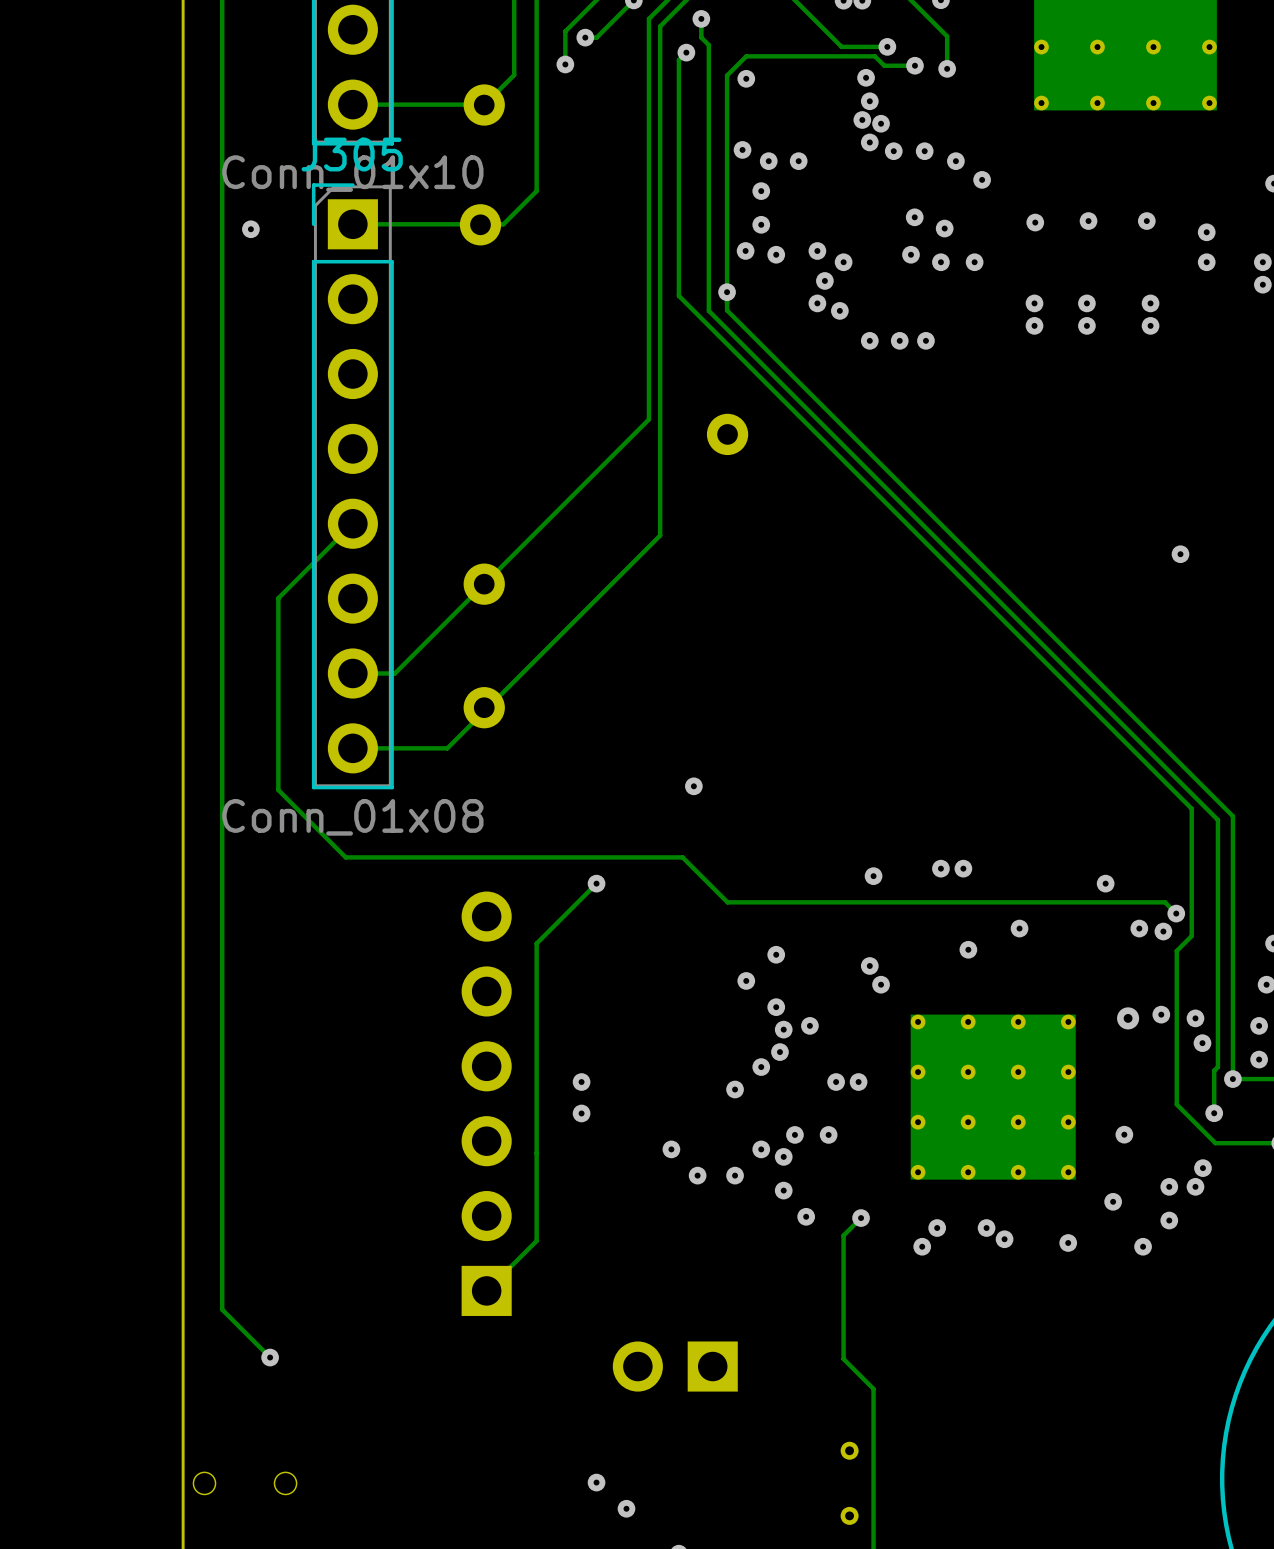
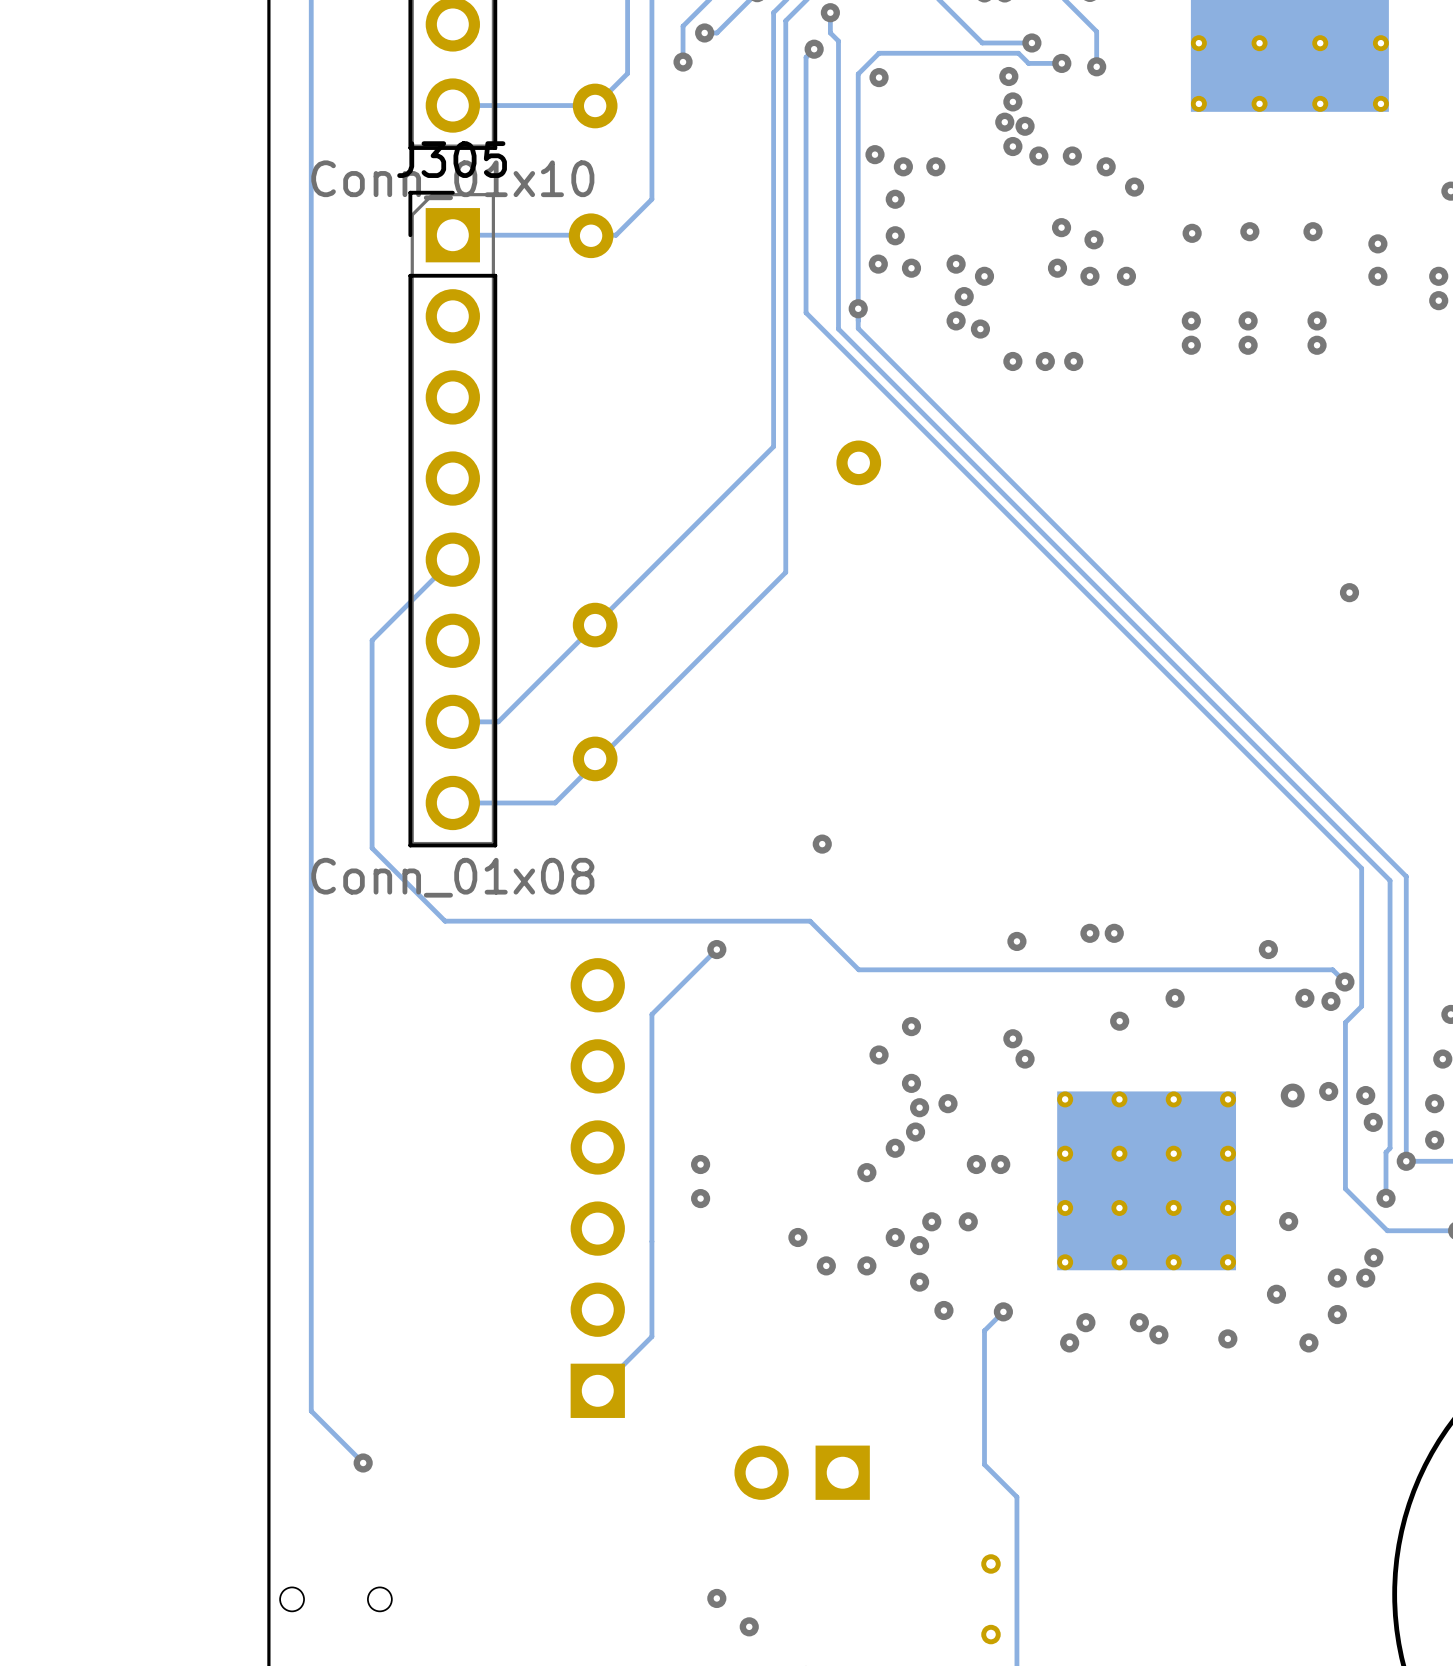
via: (250, 229) -> none

